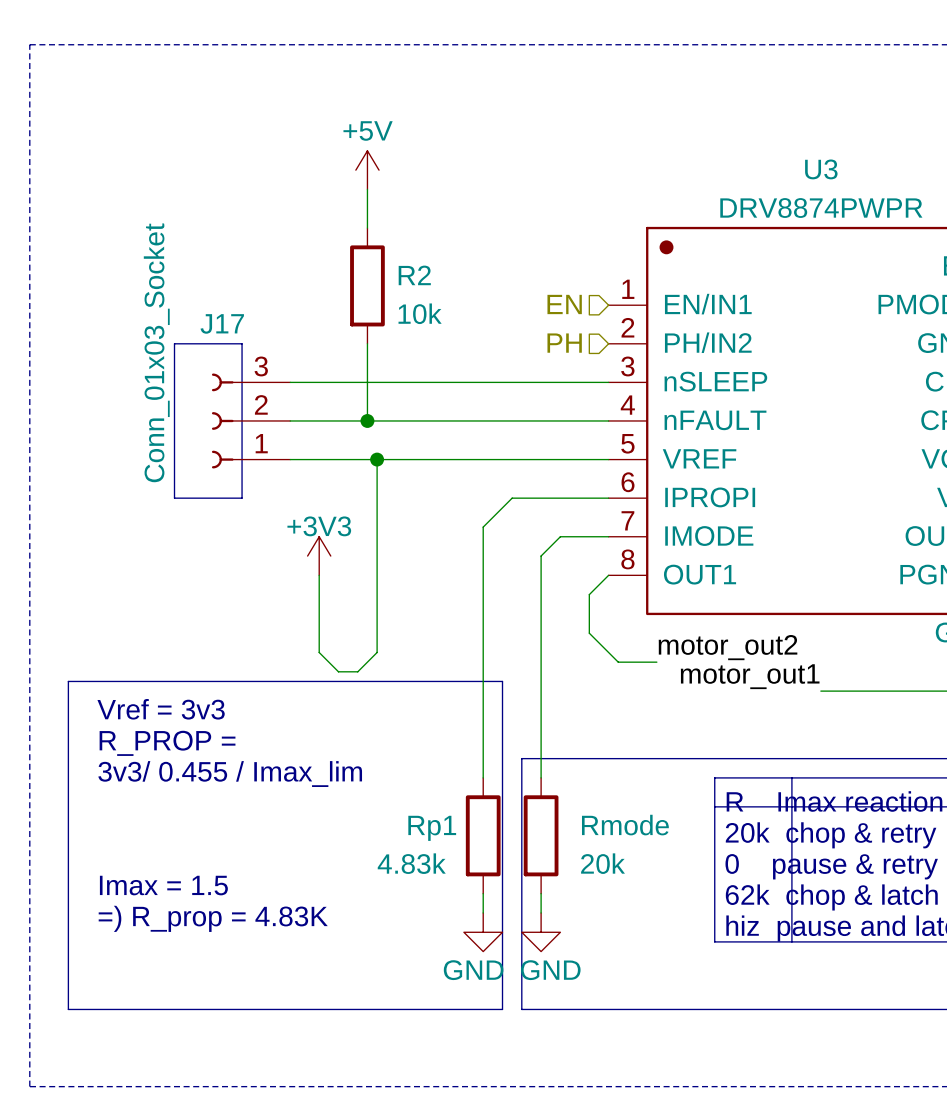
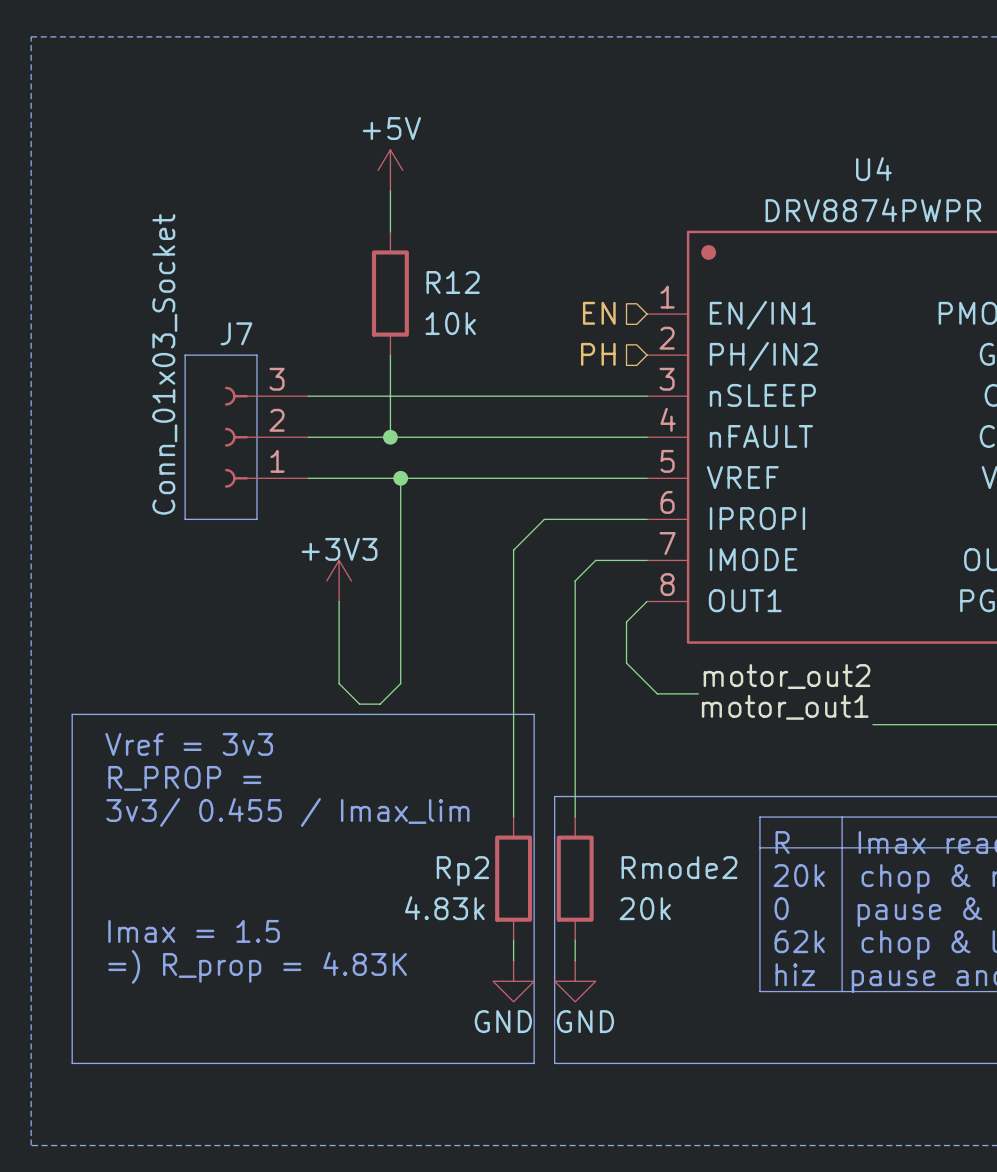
U3 name: U3 (821, 169) -> U4 (873, 169)
R2 name: R2 (414, 275) -> R12 (453, 282)
J17 name: J17 (222, 323) -> J7 (236, 333)
Rmode name: Rmode (625, 825) -> Rmode2 (679, 867)
Rp1 name: Rp1 (432, 828) -> Rp2 (462, 871)

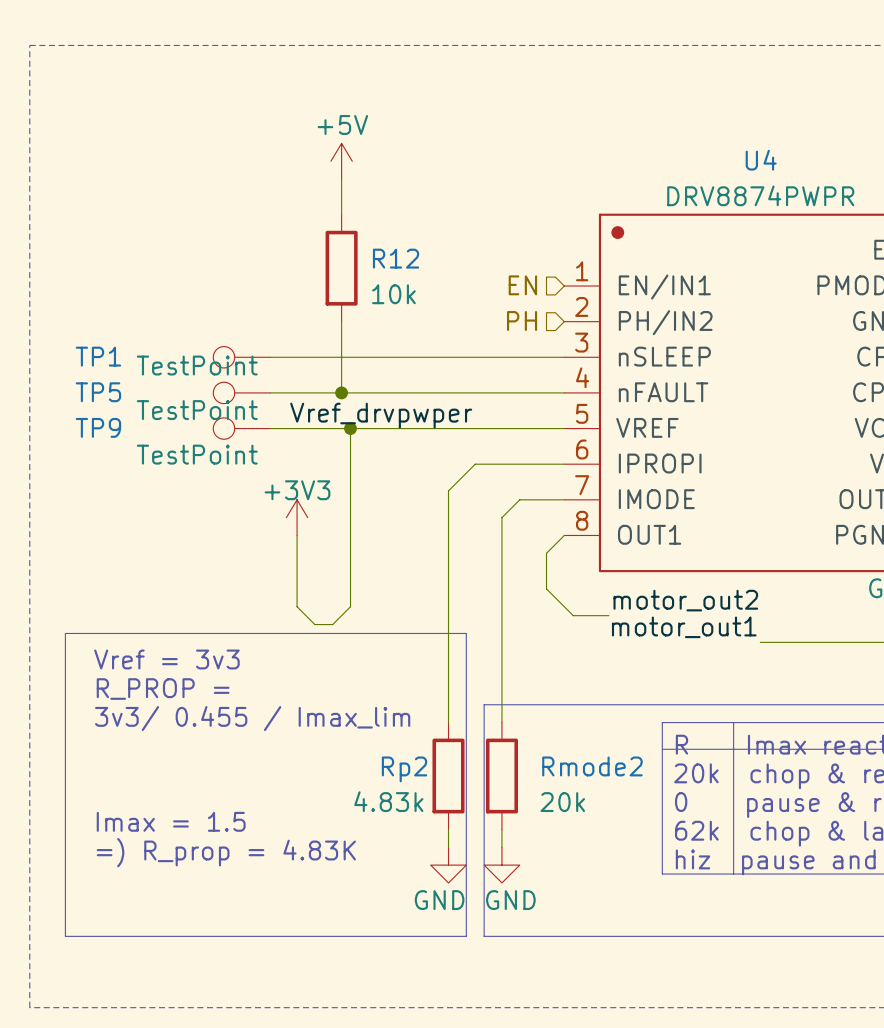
line: (185, 355) (256, 355) (256, 519) (185, 519) (185, 355) -> none
TP1: none -> TestPoint (241, 357)
J7: Conn_01x03_Socket (266, 437) -> none
TP5: none -> TestPoint (241, 392)
label: none -> Vref_drvpwper (381, 415)
TP9: none -> TestPoint (241, 428)

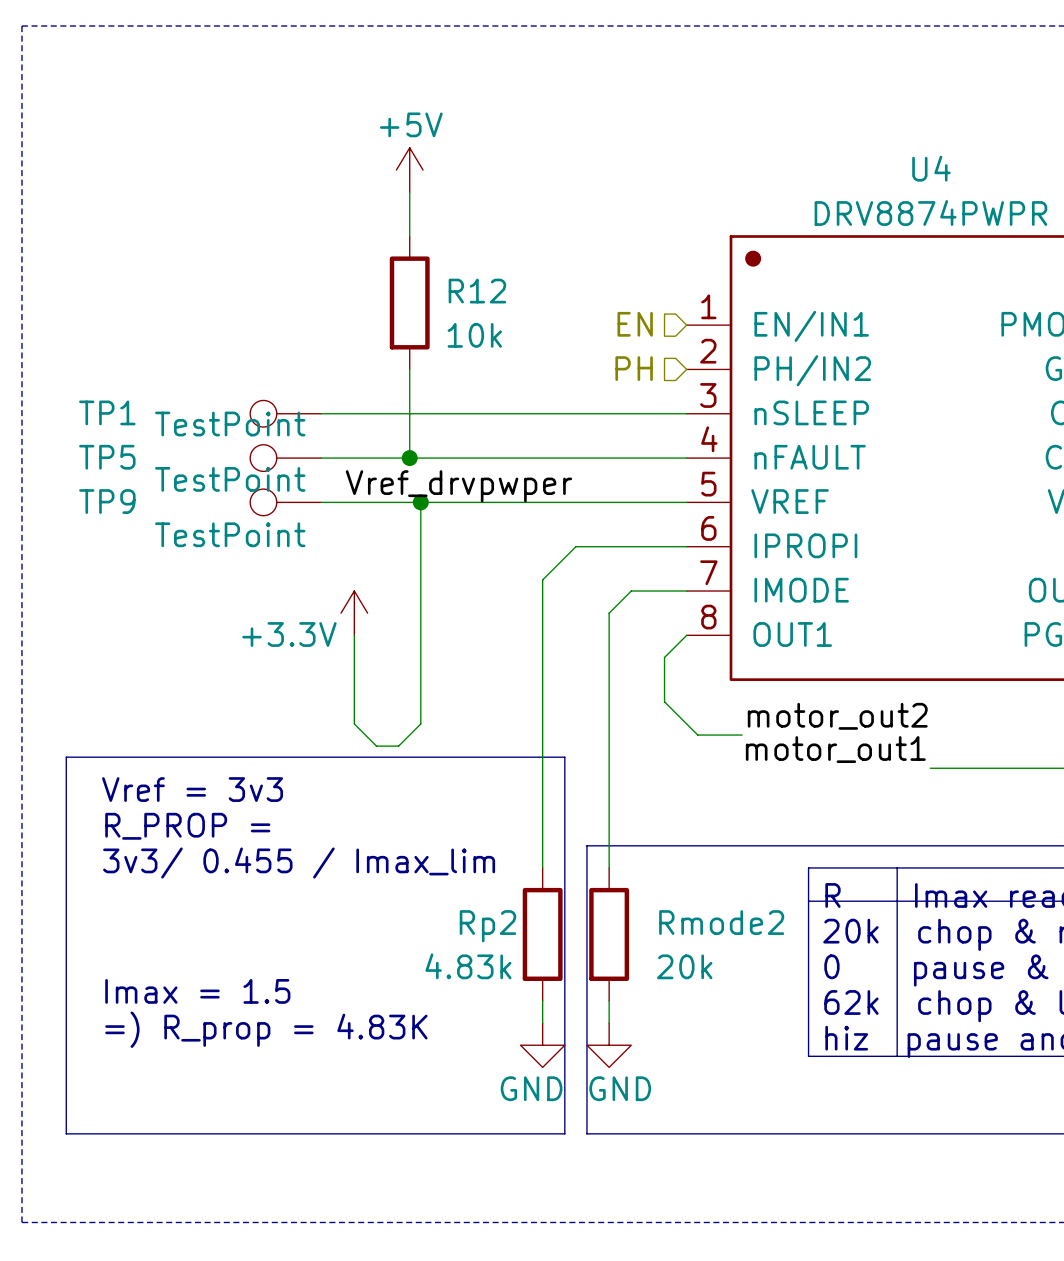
power symbol: +3V3 (297, 517) -> +3.3V (354, 613)

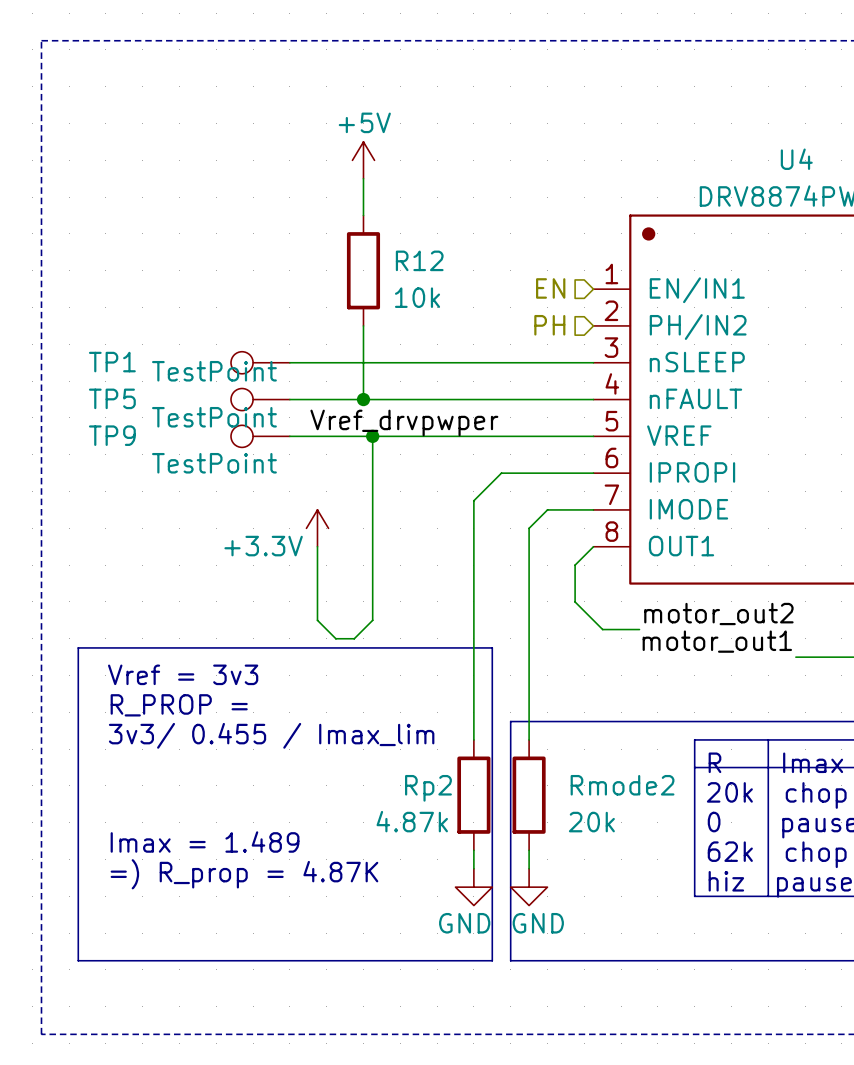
Rp2 value: 4.83k (468, 966) -> 4.87k (412, 821)
text: Imax = 1.5 (197, 991) -> Imax = 1.489 (205, 842)
text: =) R_prop = 4.83K (266, 1029) -> =) R_prop = 4.87K (244, 874)

